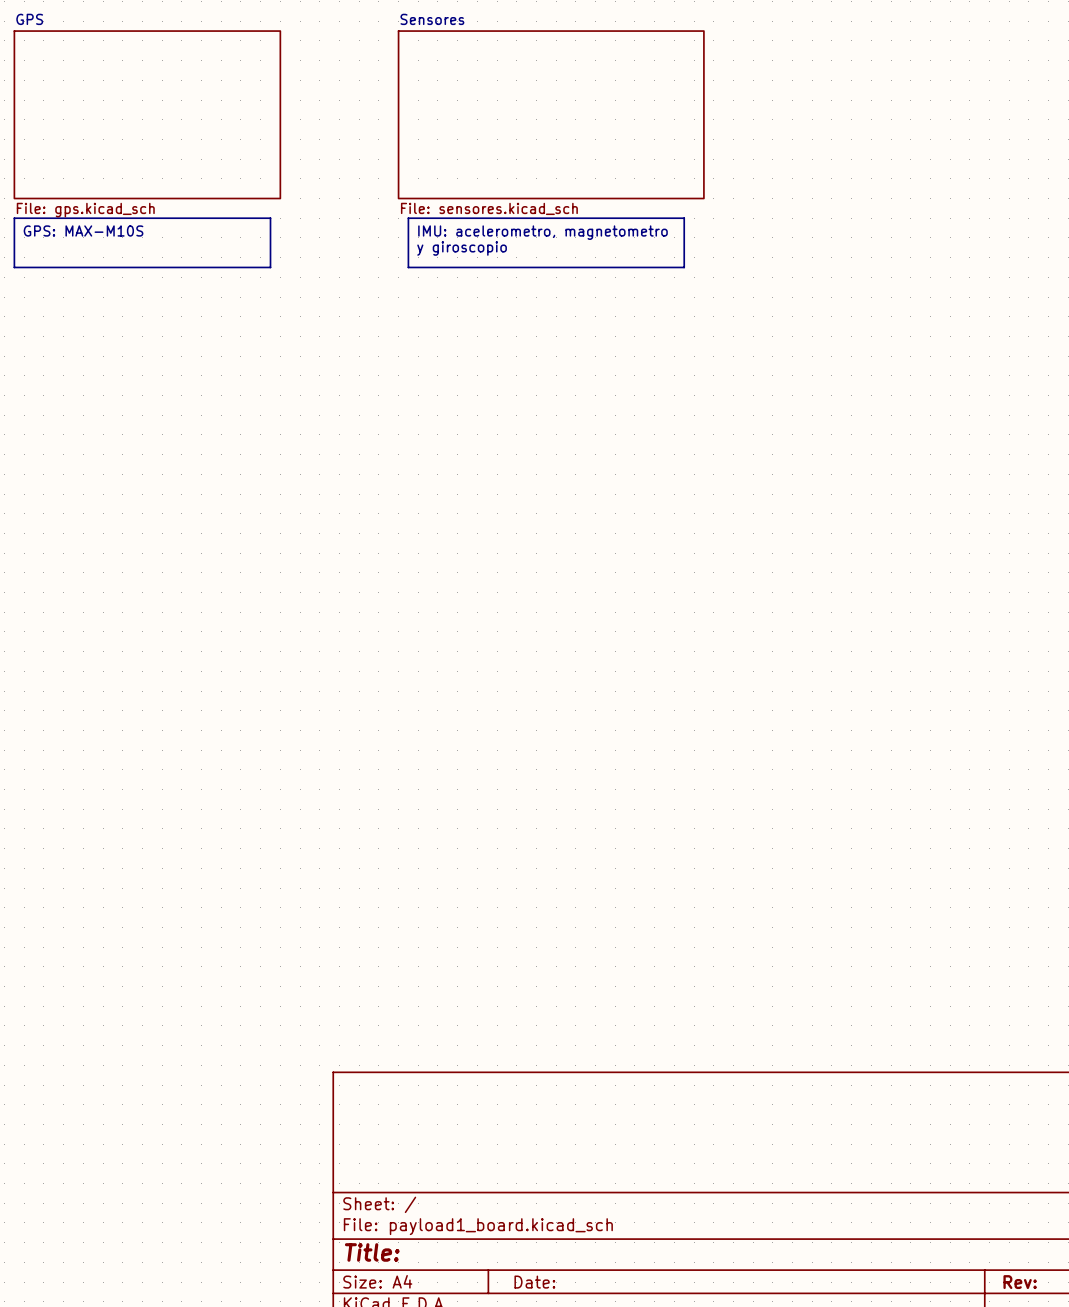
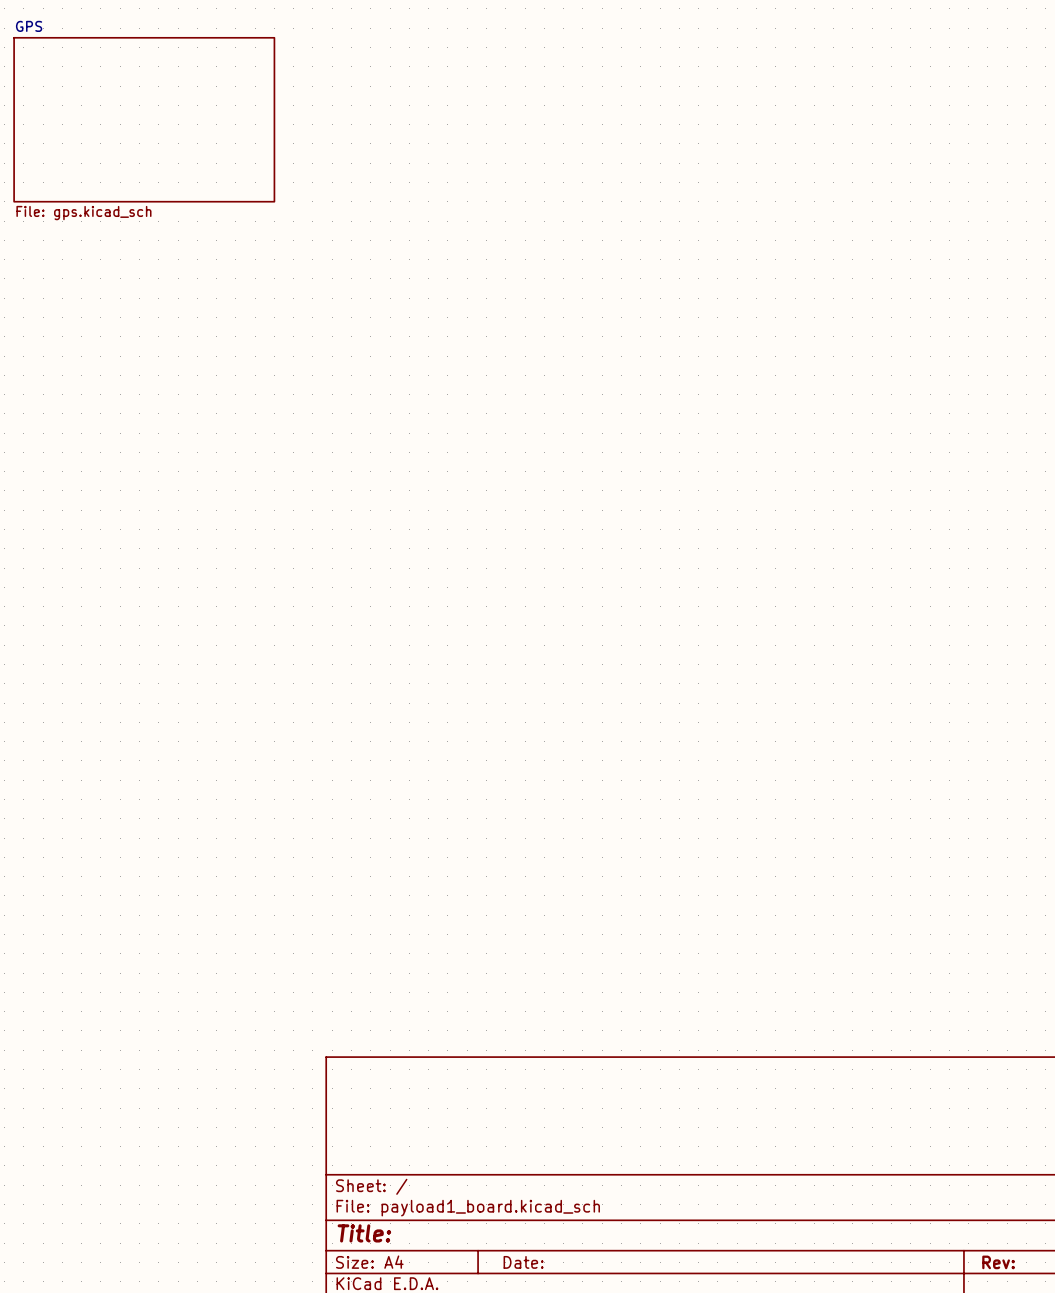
sheet Sensores: File: sensores.kicad_sch (551, 114) -> none
line: (14, 218) (270, 218) (270, 267) (14, 267) (14, 218) -> none
line: (408, 218) (684, 218) (684, 267) (408, 267) (408, 218) -> none
text: GPS: MAX-M10S (83, 230) -> none
text: IMU: acelerometro, magnetometro (542, 232) -> none
text: y giroscopio (462, 248) -> none

